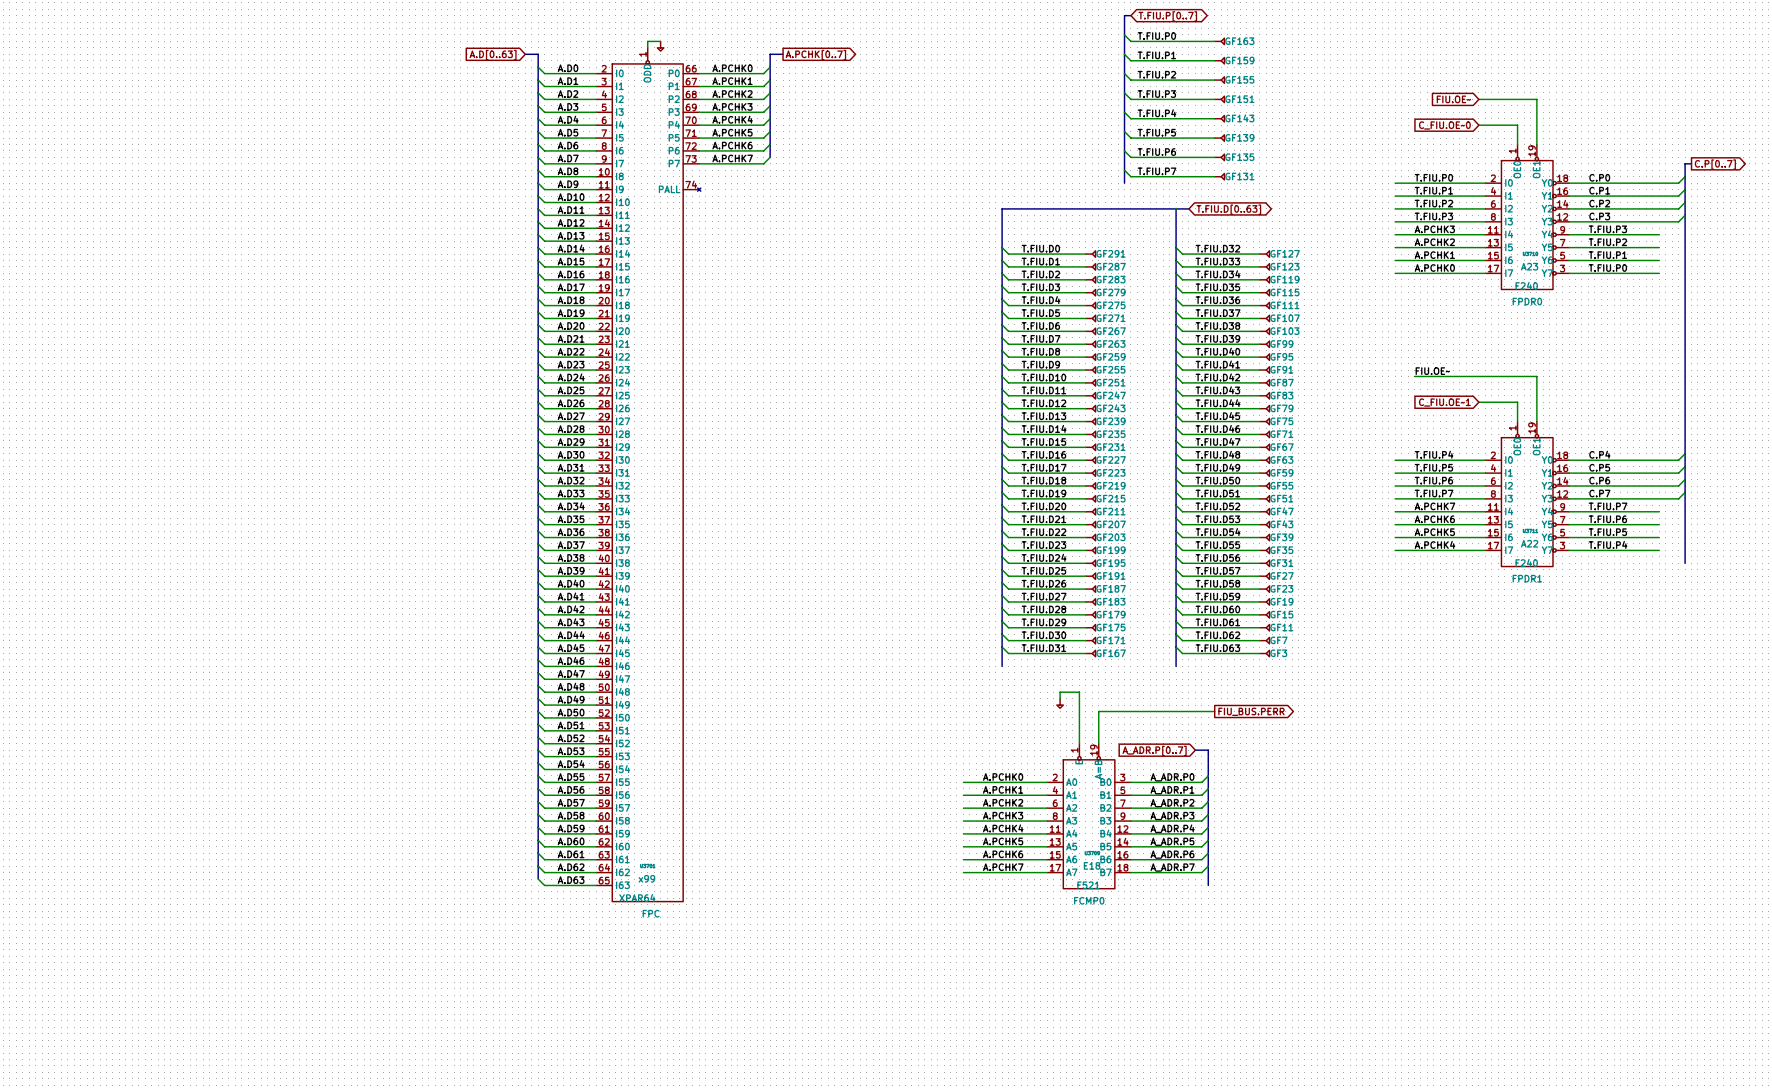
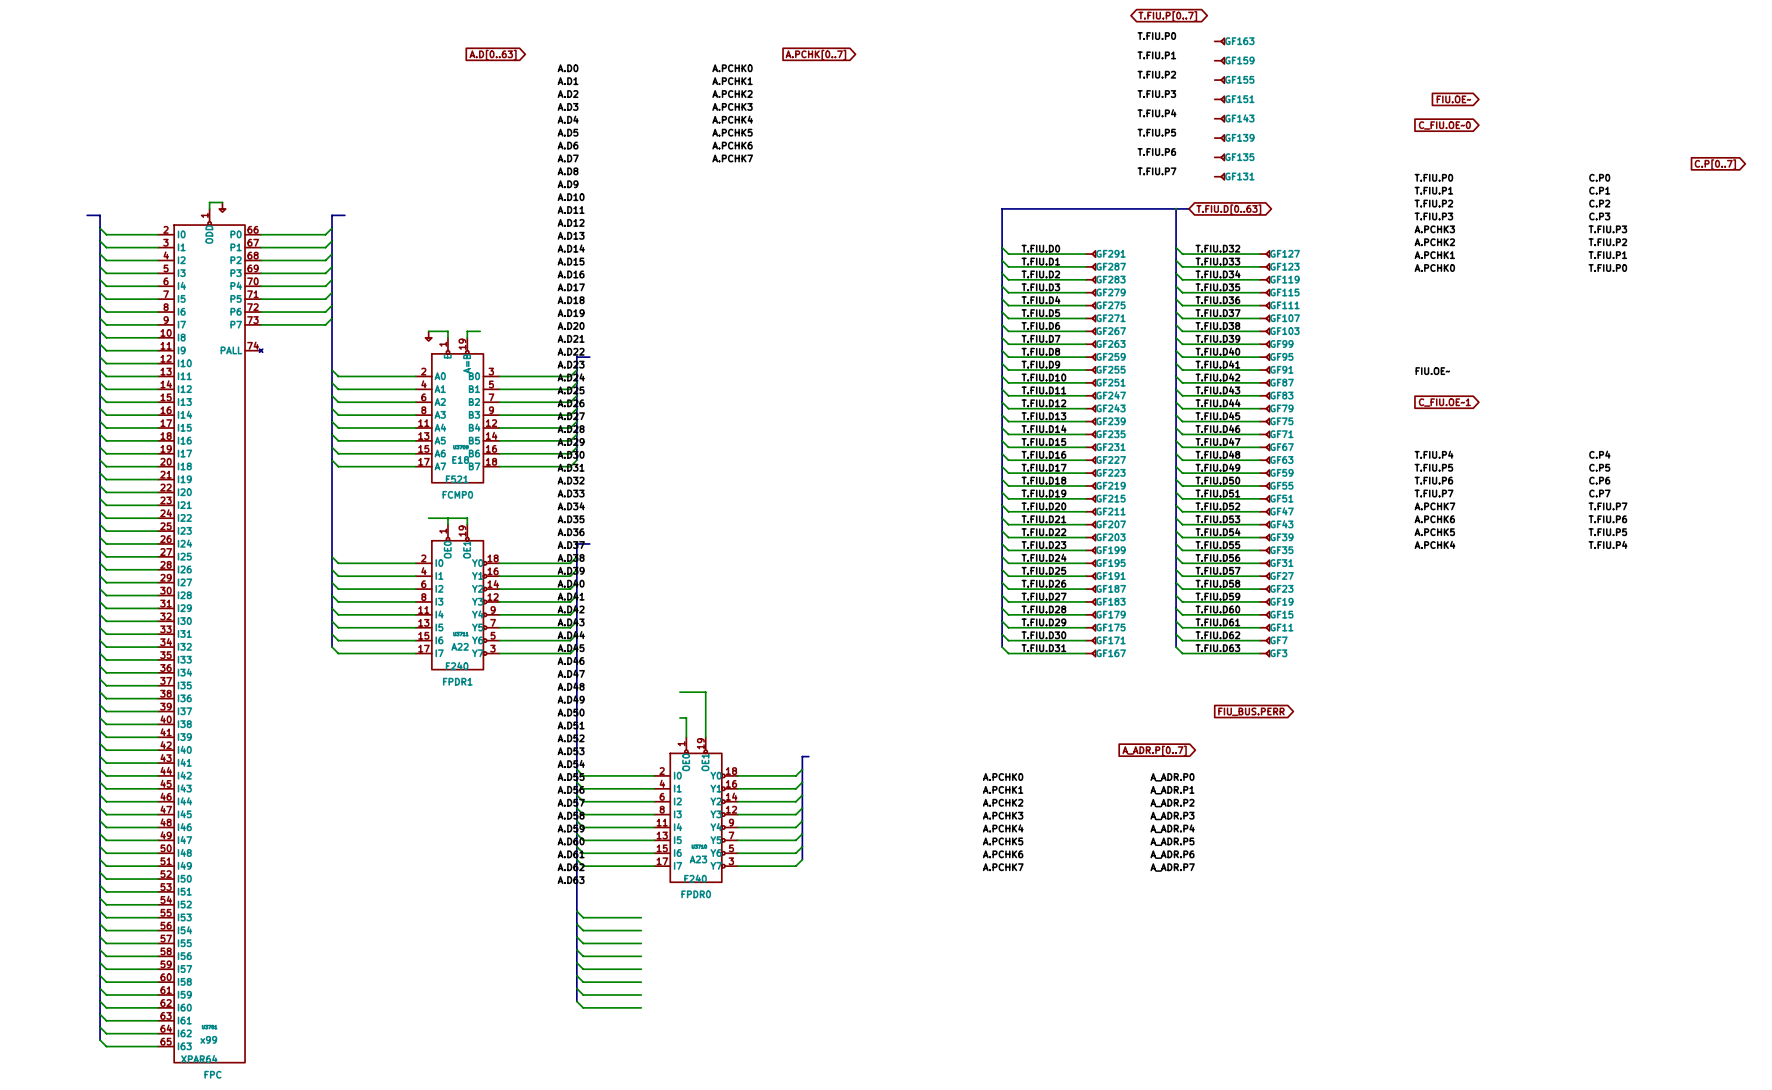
bus: (1130, 15) (1124, 15) (1124, 183) -> none
wire: (1124, 34) (1130, 41) (1214, 41) -> none
wire: (660, 41) (647, 41) (647, 47) -> none
power symbol: (660, 46) -> none
bus: (525, 54) (538, 54) (538, 879) -> none
bus: (783, 54) (770, 54) (770, 157) -> none
wire: (1124, 54) (1130, 60) (1214, 60) -> none
wire: (538, 67) (544, 73) (596, 73) -> none
wire: (770, 67) (763, 73) (699, 73) -> none
wire: (1124, 73) (1130, 80) (1214, 80) -> none
wire: (538, 80) (544, 86) (596, 86) -> none
wire: (770, 80) (763, 86) (699, 86) -> none
wire: (538, 92) (544, 99) (596, 99) -> none
wire: (770, 92) (763, 99) (699, 99) -> none
wire: (1124, 92) (1130, 99) (1214, 99) -> none
wire: (1478, 99) (1536, 99) (1536, 144) -> none
wire: (538, 105) (544, 112) (596, 112) -> none
wire: (770, 105) (763, 112) (699, 112) -> none
wire: (1124, 112) (1130, 118) (1214, 118) -> none
wire: (538, 118) (544, 125) (596, 125) -> none
wire: (770, 118) (763, 125) (699, 125) -> none
wire: (1478, 125) (1517, 125) (1517, 144) -> none
wire: (538, 131) (544, 138) (596, 138) -> none
wire: (770, 131) (763, 138) (699, 138) -> none
wire: (1124, 131) (1130, 138) (1214, 138) -> none
wire: (538, 144) (544, 150) (596, 150) -> none
wire: (770, 144) (763, 150) (699, 150) -> none
wire: (1124, 150) (1130, 157) (1214, 157) -> none
wire: (538, 157) (544, 163) (596, 163) -> none
wire: (770, 157) (763, 163) (699, 163) -> none
bus: (1691, 163) (1685, 163) (1685, 563) -> none
wire: (538, 170) (544, 176) (596, 176) -> none
wire: (1124, 170) (1130, 176) (1214, 176) -> none
wire: (1685, 176) (1678, 183) (1569, 183) -> none
wire: (538, 183) (544, 189) (596, 189) -> none
wire: (1395, 183) (1485, 183) -> none
no-connect mark: (699, 189) -> none
wire: (1685, 189) (1678, 196) (1569, 196) -> none
wire: (538, 196) (544, 202) (596, 202) -> none
wire: (1395, 196) (1485, 196) -> none
wire: none -> (222, 202) (209, 202) (209, 208)
wire: (1685, 202) (1678, 208) (1569, 208) -> none
power symbol: none -> (222, 207)
wire: (538, 208) (544, 215) (596, 215) -> none
wire: (1395, 208) (1485, 208) -> none
bus: none -> (87, 215) (100, 215) (100, 1040)
bus: none -> (344, 215) (332, 215) (332, 647)
wire: (1685, 215) (1678, 221) (1569, 221) -> none
part position: (1527, 216) -> (696, 809)
wire: (538, 221) (544, 228) (596, 228) -> none
wire: (1395, 221) (1485, 221) -> none
wire: none -> (100, 228) (106, 234) (158, 234)
wire: none -> (332, 228) (325, 234) (261, 234)
wire: (538, 234) (544, 241) (596, 241) -> none
wire: (1395, 234) (1485, 234) -> none
wire: (1569, 234) (1659, 234) -> none
wire: none -> (100, 241) (106, 247) (158, 247)
wire: none -> (332, 241) (325, 247) (261, 247)
wire: (538, 247) (544, 254) (596, 254) -> none
wire: (1395, 247) (1485, 247) -> none
wire: (1569, 247) (1659, 247) -> none
wire: none -> (100, 254) (106, 260) (158, 260)
wire: none -> (332, 254) (325, 260) (261, 260)
wire: (538, 260) (544, 266) (596, 266) -> none
wire: (1395, 260) (1485, 260) -> none
wire: (1569, 260) (1659, 260) -> none
wire: none -> (100, 266) (106, 273) (158, 273)
wire: none -> (332, 266) (325, 273) (261, 273)
wire: (538, 273) (544, 279) (596, 279) -> none
wire: (1395, 273) (1485, 273) -> none
wire: (1569, 273) (1659, 273) -> none
wire: none -> (100, 279) (106, 286) (158, 286)
wire: none -> (332, 279) (325, 286) (261, 286)
wire: (538, 286) (544, 292) (596, 292) -> none
wire: none -> (100, 292) (106, 299) (158, 299)
wire: none -> (332, 292) (325, 299) (261, 299)
wire: (538, 299) (544, 305) (596, 305) -> none
wire: none -> (100, 305) (106, 312) (158, 312)
wire: none -> (332, 305) (325, 312) (261, 312)
wire: (538, 312) (544, 318) (596, 318) -> none
wire: none -> (100, 318) (106, 324) (158, 324)
wire: none -> (332, 318) (325, 324) (261, 324)
wire: (538, 324) (544, 331) (596, 331) -> none
wire: none -> (100, 331) (106, 337) (158, 337)
wire: none -> (428, 331) (447, 331) (447, 337)
wire: none -> (480, 331) (467, 331) (467, 337)
power symbol: none -> (428, 336)
wire: (538, 337) (544, 344) (596, 344) -> none
wire: none -> (100, 344) (106, 350) (158, 350)
no-connect mark: none -> (261, 350)
wire: (538, 350) (544, 357) (596, 357) -> none
wire: none -> (100, 357) (106, 363) (158, 363)
bus: none -> (589, 357) (576, 357) (576, 460)
wire: (538, 363) (544, 370) (596, 370) -> none
wire: none -> (100, 370) (106, 376) (158, 376)
wire: none -> (332, 370) (338, 376) (415, 376)
wire: none -> (576, 370) (570, 376) (499, 376)
wire: (538, 376) (544, 382) (596, 382) -> none
wire: (1414, 376) (1536, 376) (1536, 421) -> none
wire: none -> (100, 382) (106, 389) (158, 389)
wire: none -> (332, 382) (338, 389) (415, 389)
wire: none -> (576, 382) (570, 389) (499, 389)
wire: (538, 389) (544, 395) (596, 395) -> none
wire: none -> (100, 395) (106, 402) (158, 402)
wire: none -> (332, 395) (338, 402) (415, 402)
wire: none -> (576, 395) (570, 402) (499, 402)
wire: (538, 402) (544, 408) (596, 408) -> none
wire: (1478, 402) (1517, 402) (1517, 421) -> none
wire: none -> (100, 408) (106, 415) (158, 415)
wire: none -> (332, 408) (338, 415) (415, 415)
wire: none -> (576, 408) (570, 415) (499, 415)
wire: (538, 415) (544, 421) (596, 421) -> none
wire: none -> (100, 421) (106, 428) (158, 428)
wire: none -> (332, 421) (338, 428) (415, 428)
wire: none -> (576, 421) (570, 428) (499, 428)
wire: (538, 428) (544, 434) (596, 434) -> none
wire: none -> (100, 434) (106, 440) (158, 440)
wire: none -> (332, 434) (338, 440) (415, 440)
wire: none -> (576, 434) (570, 440) (499, 440)
wire: (538, 440) (544, 447) (596, 447) -> none
wire: none -> (100, 447) (106, 453) (158, 453)
wire: none -> (332, 447) (338, 453) (415, 453)
wire: none -> (576, 447) (570, 453) (499, 453)
wire: (538, 453) (544, 460) (596, 460) -> none
wire: (1685, 453) (1678, 460) (1569, 460) -> none
wire: none -> (100, 460) (106, 466) (158, 466)
wire: none -> (332, 460) (338, 466) (415, 466)
wire: none -> (576, 460) (570, 466) (499, 466)
wire: (1395, 460) (1485, 460) -> none
wire: (538, 466) (544, 473) (596, 473) -> none
wire: (1685, 466) (1678, 473) (1569, 473) -> none
wire: none -> (100, 473) (106, 479) (158, 479)
wire: (1395, 473) (1485, 473) -> none
part position: (647, 474) -> (209, 635)
wire: (538, 479) (544, 486) (596, 486) -> none
wire: (1685, 479) (1678, 486) (1569, 486) -> none
wire: none -> (100, 486) (106, 492) (158, 492)
wire: (1395, 486) (1485, 486) -> none
wire: (538, 492) (544, 498) (596, 498) -> none
wire: (1685, 492) (1678, 498) (1569, 498) -> none
part position: (1527, 494) -> (457, 597)
wire: none -> (100, 498) (106, 505) (158, 505)
wire: (1395, 498) (1485, 498) -> none
wire: (538, 505) (544, 511) (596, 511) -> none
wire: none -> (100, 511) (106, 518) (158, 518)
wire: (1395, 511) (1485, 511) -> none
wire: (1569, 511) (1659, 511) -> none
wire: none -> (428, 518) (467, 518) (467, 524)
wire: none -> (447, 518) (447, 524)
wire: (538, 518) (544, 524) (596, 524) -> none
wire: none -> (100, 524) (106, 531) (158, 531)
wire: (1395, 524) (1485, 524) -> none
wire: (1569, 524) (1659, 524) -> none
wire: (538, 531) (544, 537) (596, 537) -> none
wire: none -> (100, 537) (106, 543) (158, 543)
wire: (1395, 537) (1485, 537) -> none
wire: (1569, 537) (1659, 537) -> none
wire: (538, 543) (544, 550) (596, 550) -> none
bus: none -> (589, 543) (576, 543) (576, 1001)
wire: none -> (100, 550) (106, 556) (158, 556)
wire: (1395, 550) (1485, 550) -> none
wire: (1569, 550) (1659, 550) -> none
wire: none -> (332, 556) (338, 563) (415, 563)
wire: (538, 556) (544, 563) -> (499, 563) (544, 563)
wire: none -> (100, 563) (106, 569) (158, 569)
wire: (570, 563) (596, 563) -> (570, 563) (576, 556)
wire: none -> (332, 569) (338, 576) (415, 576)
wire: (538, 569) (544, 576) -> (499, 576) (544, 576)
wire: none -> (100, 576) (106, 582) (158, 582)
wire: (570, 576) (596, 576) -> (570, 576) (576, 569)
wire: none -> (332, 582) (338, 589) (415, 589)
wire: (538, 582) (544, 589) -> (499, 589) (544, 589)
wire: none -> (100, 589) (106, 595) (158, 595)
wire: (570, 589) (596, 589) -> (570, 589) (576, 582)
wire: none -> (332, 595) (338, 601) (415, 601)
wire: (538, 595) (544, 601) -> (499, 601) (544, 601)
wire: none -> (100, 601) (106, 608) (158, 608)
wire: (570, 601) (596, 601) -> (570, 601) (576, 595)
wire: none -> (332, 608) (338, 614) (415, 614)
wire: (538, 608) (544, 614) -> (499, 614) (544, 614)
wire: none -> (100, 614) (106, 621) (158, 621)
wire: (570, 614) (596, 614) -> (570, 614) (576, 608)
wire: none -> (332, 621) (338, 627) (415, 627)
wire: (538, 621) (544, 627) -> (499, 627) (544, 627)
wire: none -> (100, 627) (106, 634) (158, 634)
wire: (570, 627) (596, 627) -> (570, 627) (576, 621)
wire: none -> (332, 634) (338, 640) (415, 640)
wire: (538, 634) (544, 640) -> (499, 640) (544, 640)
wire: none -> (100, 640) (106, 647) (158, 647)
wire: (570, 640) (596, 640) -> (570, 640) (576, 634)
wire: none -> (332, 647) (338, 653) (415, 653)
wire: (538, 647) (544, 653) -> (499, 653) (544, 653)
bus: (1002, 647) (1002, 666) -> none
bus: (1176, 647) (1176, 666) -> none
wire: none -> (100, 653) (106, 659) (158, 659)
wire: (570, 653) (596, 653) -> (570, 653) (576, 647)
wire: (538, 659) (544, 666) (596, 666) -> none
wire: none -> (100, 666) (106, 672) (158, 672)
wire: (538, 672) (544, 679) (596, 679) -> none
wire: none -> (100, 679) (106, 685) (158, 685)
wire: (538, 685) (544, 692) (596, 692) -> none
wire: none -> (100, 692) (106, 698) (158, 698)
wire: none -> (679, 692) (705, 692) (705, 737)
wire: (538, 698) (544, 705) (596, 705) -> none
wire: (1060, 698) (1060, 692) (1079, 692) (1079, 743) -> none
power symbol: (1060, 703) -> none
wire: none -> (100, 705) (106, 711) (158, 711)
wire: (538, 711) (544, 717) (596, 717) -> none
wire: (1214, 711) (1098, 711) (1098, 743) -> none
wire: none -> (100, 717) (106, 724) (158, 724)
wire: none -> (679, 717) (686, 717) (686, 737)
wire: (538, 724) (544, 730) (596, 730) -> none
wire: none -> (100, 730) (106, 737) (158, 737)
wire: (538, 737) (544, 743) (596, 743) -> none
wire: none -> (100, 743) (106, 750) (158, 750)
wire: (538, 750) (544, 756) (596, 756) -> none
bus: (1195, 750) (1208, 750) (1208, 885) -> none
wire: none -> (100, 756) (106, 763) (158, 763)
bus: none -> (808, 756) (802, 756) (802, 859)
wire: (538, 763) (544, 769) (596, 769) -> none
wire: none -> (100, 769) (106, 775) (158, 775)
wire: none -> (576, 769) (583, 775) (654, 775)
wire: none -> (802, 769) (795, 775) (737, 775)
wire: (538, 775) (544, 782) (596, 782) -> none
wire: (1208, 775) (1201, 782) (1130, 782) -> none
wire: none -> (100, 782) (106, 788) (158, 788)
wire: none -> (576, 782) (583, 788) (654, 788)
wire: none -> (802, 782) (795, 788) (737, 788)
wire: (963, 782) (1047, 782) -> none
wire: (538, 788) (544, 795) (596, 795) -> none
wire: (1208, 788) (1201, 795) (1130, 795) -> none
wire: none -> (100, 795) (106, 801) (158, 801)
wire: none -> (576, 795) (583, 801) (654, 801)
wire: none -> (802, 795) (795, 801) (737, 801)
wire: (963, 795) (1047, 795) -> none
wire: (538, 801) (544, 808) (596, 808) -> none
wire: (1208, 801) (1201, 808) (1130, 808) -> none
wire: none -> (100, 808) (106, 814) (158, 814)
wire: none -> (576, 808) (583, 814) (654, 814)
wire: none -> (802, 808) (795, 814) (737, 814)
wire: (963, 808) (1047, 808) -> none
wire: (538, 814) (544, 821) (596, 821) -> none
wire: (1208, 814) (1201, 821) (1130, 821) -> none
part position: (1089, 816) -> (457, 410)
wire: none -> (100, 821) (106, 827) (158, 827)
wire: none -> (576, 821) (583, 827) (654, 827)
wire: none -> (802, 821) (795, 827) (737, 827)
wire: (963, 821) (1047, 821) -> none
wire: (538, 827) (544, 833) (596, 833) -> none
wire: (1208, 827) (1201, 833) (1130, 833) -> none
wire: none -> (100, 833) (106, 840) (158, 840)
wire: none -> (576, 833) (583, 840) (654, 840)
wire: none -> (802, 833) (795, 840) (737, 840)
wire: (963, 833) (1047, 833) -> none
wire: (538, 840) (544, 846) (596, 846) -> none
wire: (1208, 840) (1201, 846) (1130, 846) -> none
wire: none -> (100, 846) (106, 853) (158, 853)
wire: none -> (576, 846) (583, 853) (654, 853)
wire: none -> (802, 846) (795, 853) (737, 853)
wire: (963, 846) (1047, 846) -> none
wire: (538, 853) (544, 859) (596, 859) -> none
wire: (1208, 853) (1201, 859) (1130, 859) -> none
wire: none -> (100, 859) (106, 866) (158, 866)
wire: none -> (576, 859) (583, 866) (654, 866)
wire: none -> (802, 859) (795, 866) (737, 866)
wire: (963, 859) (1047, 859) -> none
wire: (538, 866) (544, 872) (596, 872) -> none
wire: (1208, 866) (1201, 872) (1130, 872) -> none
wire: none -> (100, 872) (106, 879) (158, 879)
wire: (963, 872) (1047, 872) -> none
wire: (538, 879) (544, 885) (596, 885) -> none
wire: none -> (100, 885) (106, 891) (158, 891)
wire: none -> (100, 898) (106, 904) (158, 904)
wire: none -> (100, 911) (106, 917) (158, 917)
wire: none -> (576, 911) (583, 917) (641, 917)
wire: none -> (100, 924) (106, 930) (158, 930)
wire: none -> (576, 924) (583, 930) (641, 930)
wire: none -> (100, 937) (106, 943) (158, 943)
wire: none -> (576, 937) (583, 943) (641, 943)
wire: none -> (100, 949) (106, 956) (158, 956)
wire: none -> (576, 949) (583, 956) (641, 956)
wire: none -> (100, 962) (106, 969) (158, 969)
wire: none -> (576, 962) (583, 969) (641, 969)
wire: none -> (100, 975) (106, 982) (158, 982)
wire: none -> (576, 975) (583, 982) (641, 982)
wire: none -> (100, 988) (106, 995) (158, 995)
wire: none -> (576, 988) (583, 995) (641, 995)
wire: none -> (100, 1001) (106, 1007) (158, 1007)
wire: none -> (576, 1001) (583, 1007) (641, 1007)
wire: none -> (100, 1014) (106, 1020) (158, 1020)
wire: none -> (100, 1027) (106, 1033) (158, 1033)
wire: none -> (100, 1040) (106, 1046) (158, 1046)

